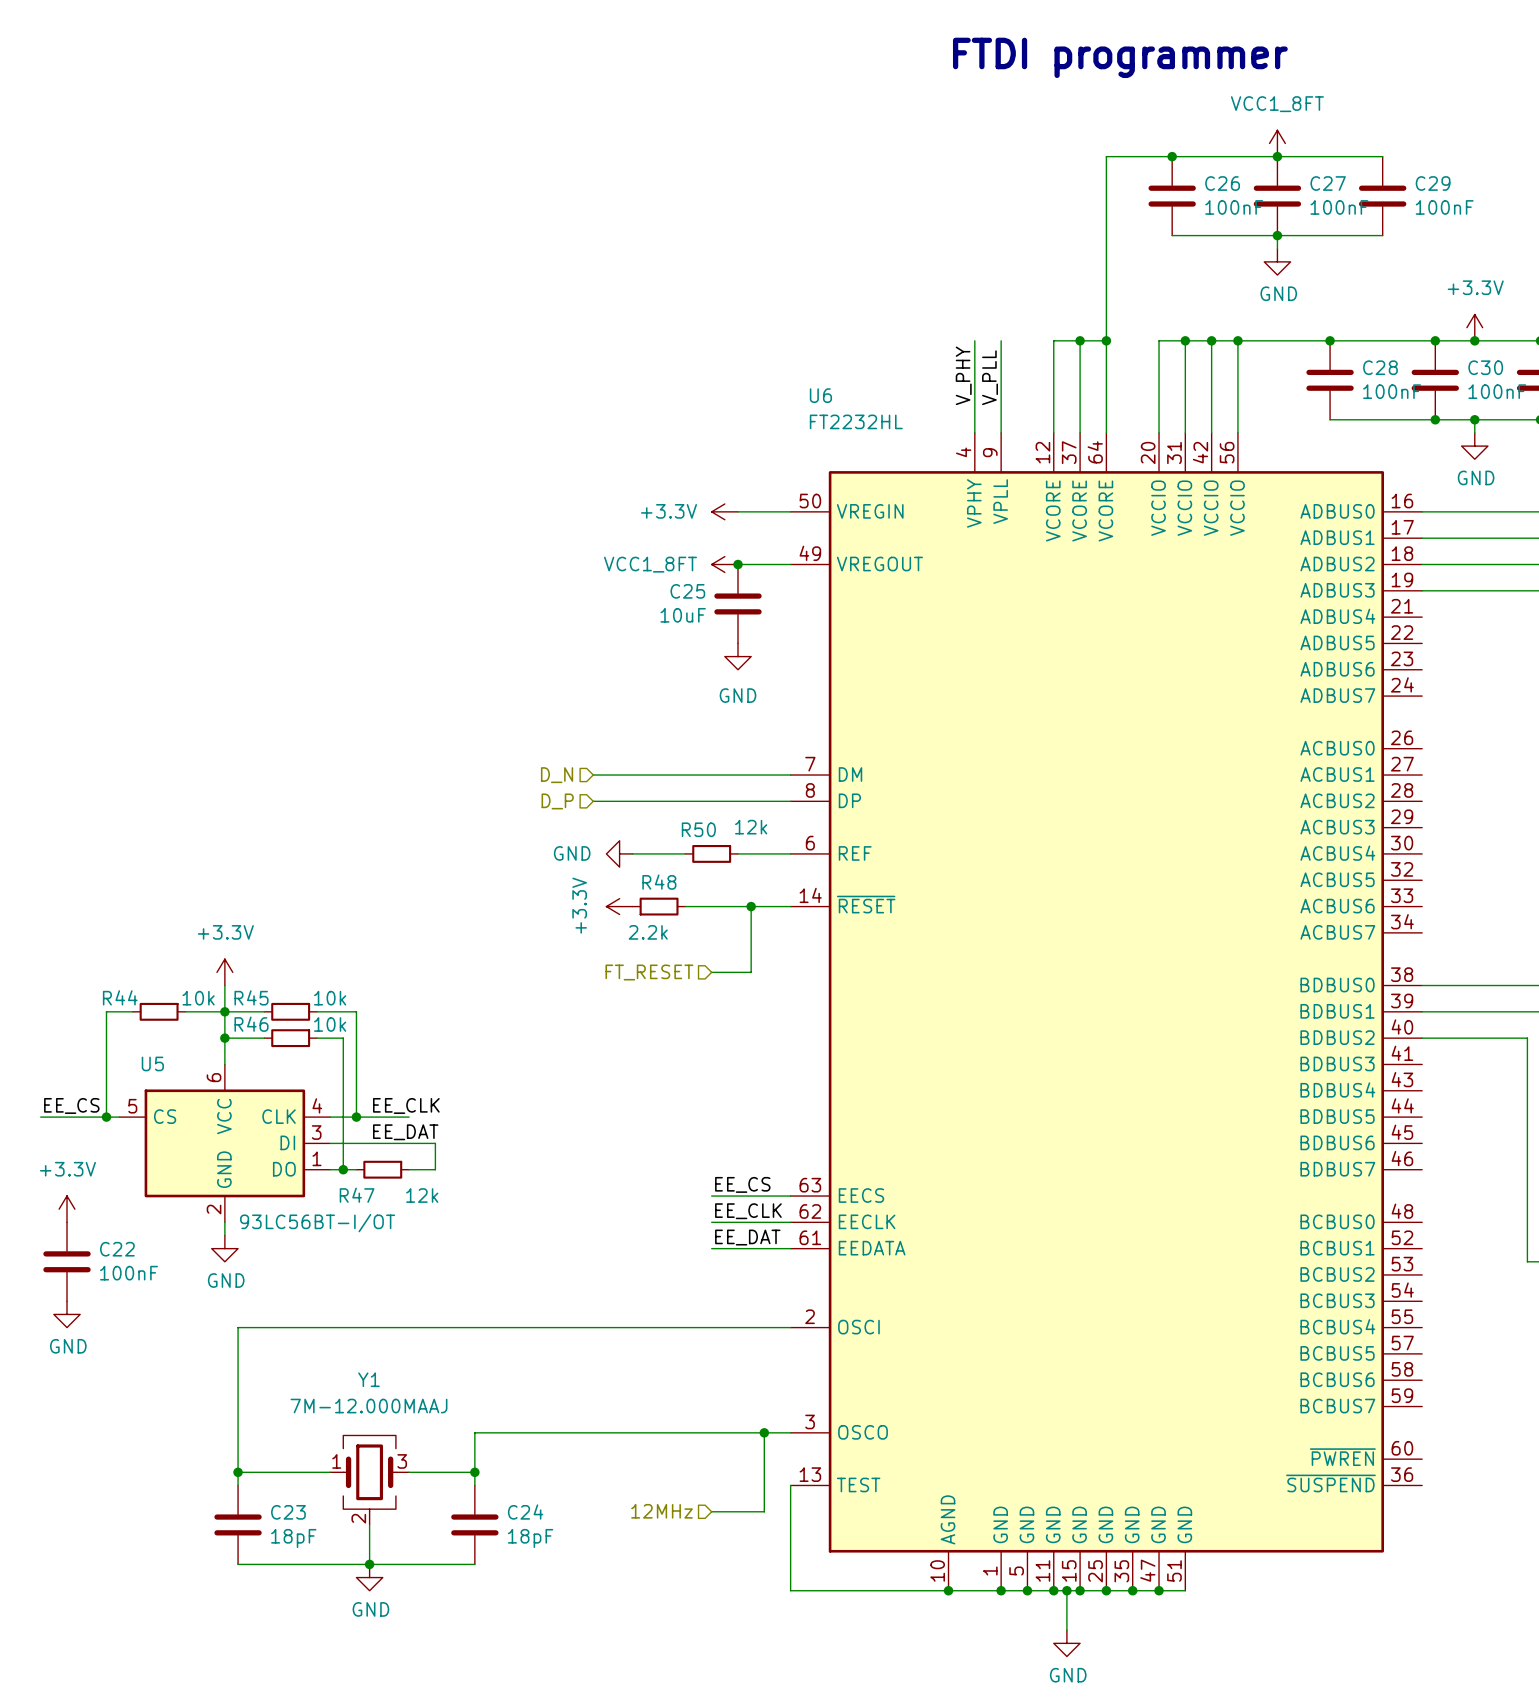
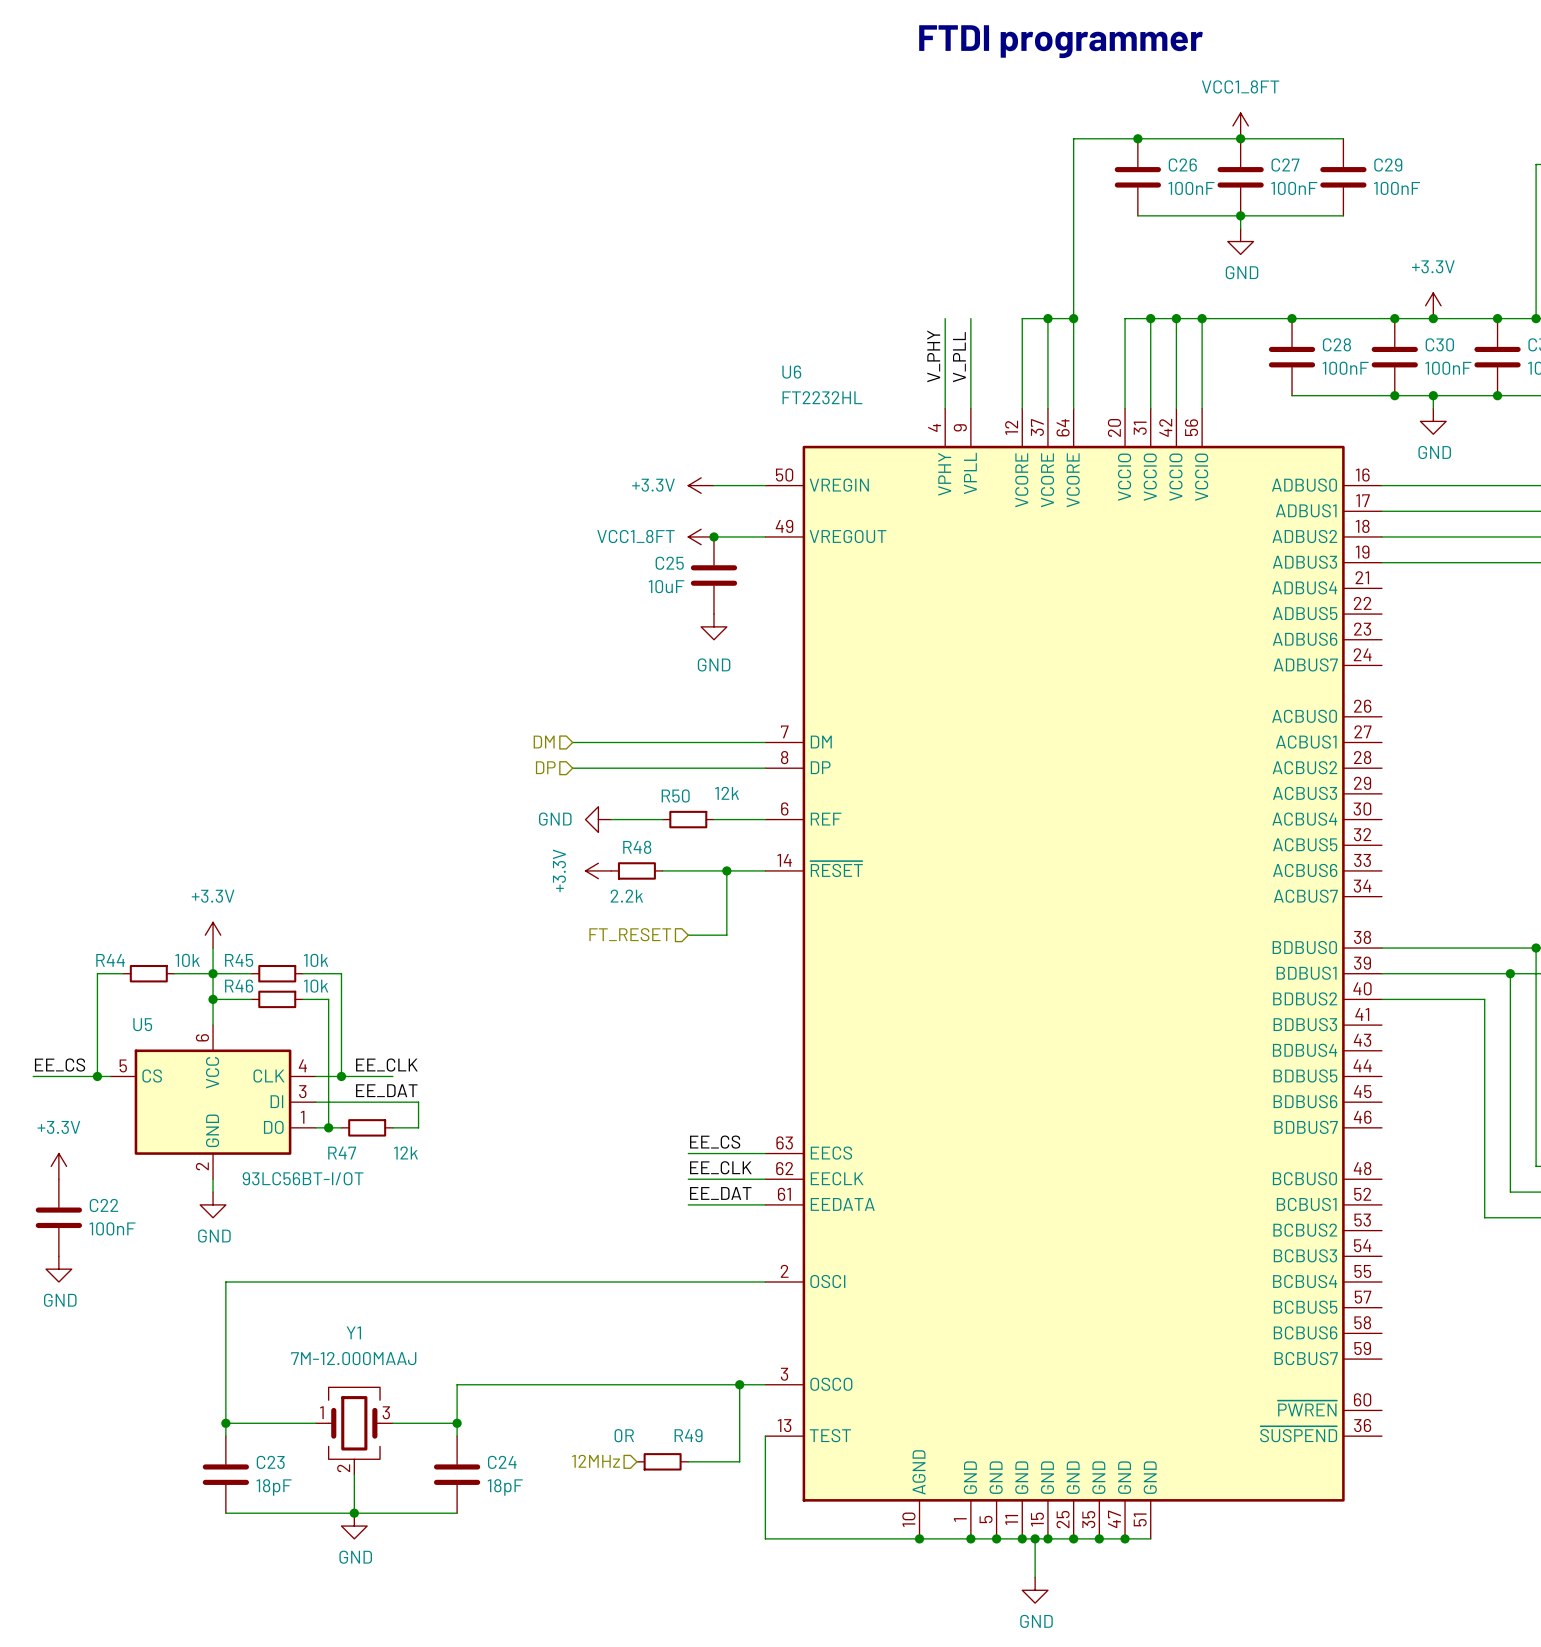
hierarchical label: D_N (557, 775) -> DM (544, 742)
hierarchical label: D_P (557, 801) -> DP (545, 767)
hierarchical label position: 12MHz (661, 1511) -> 12MHz (596, 1461)
R49: none -> 0R (662, 1461)

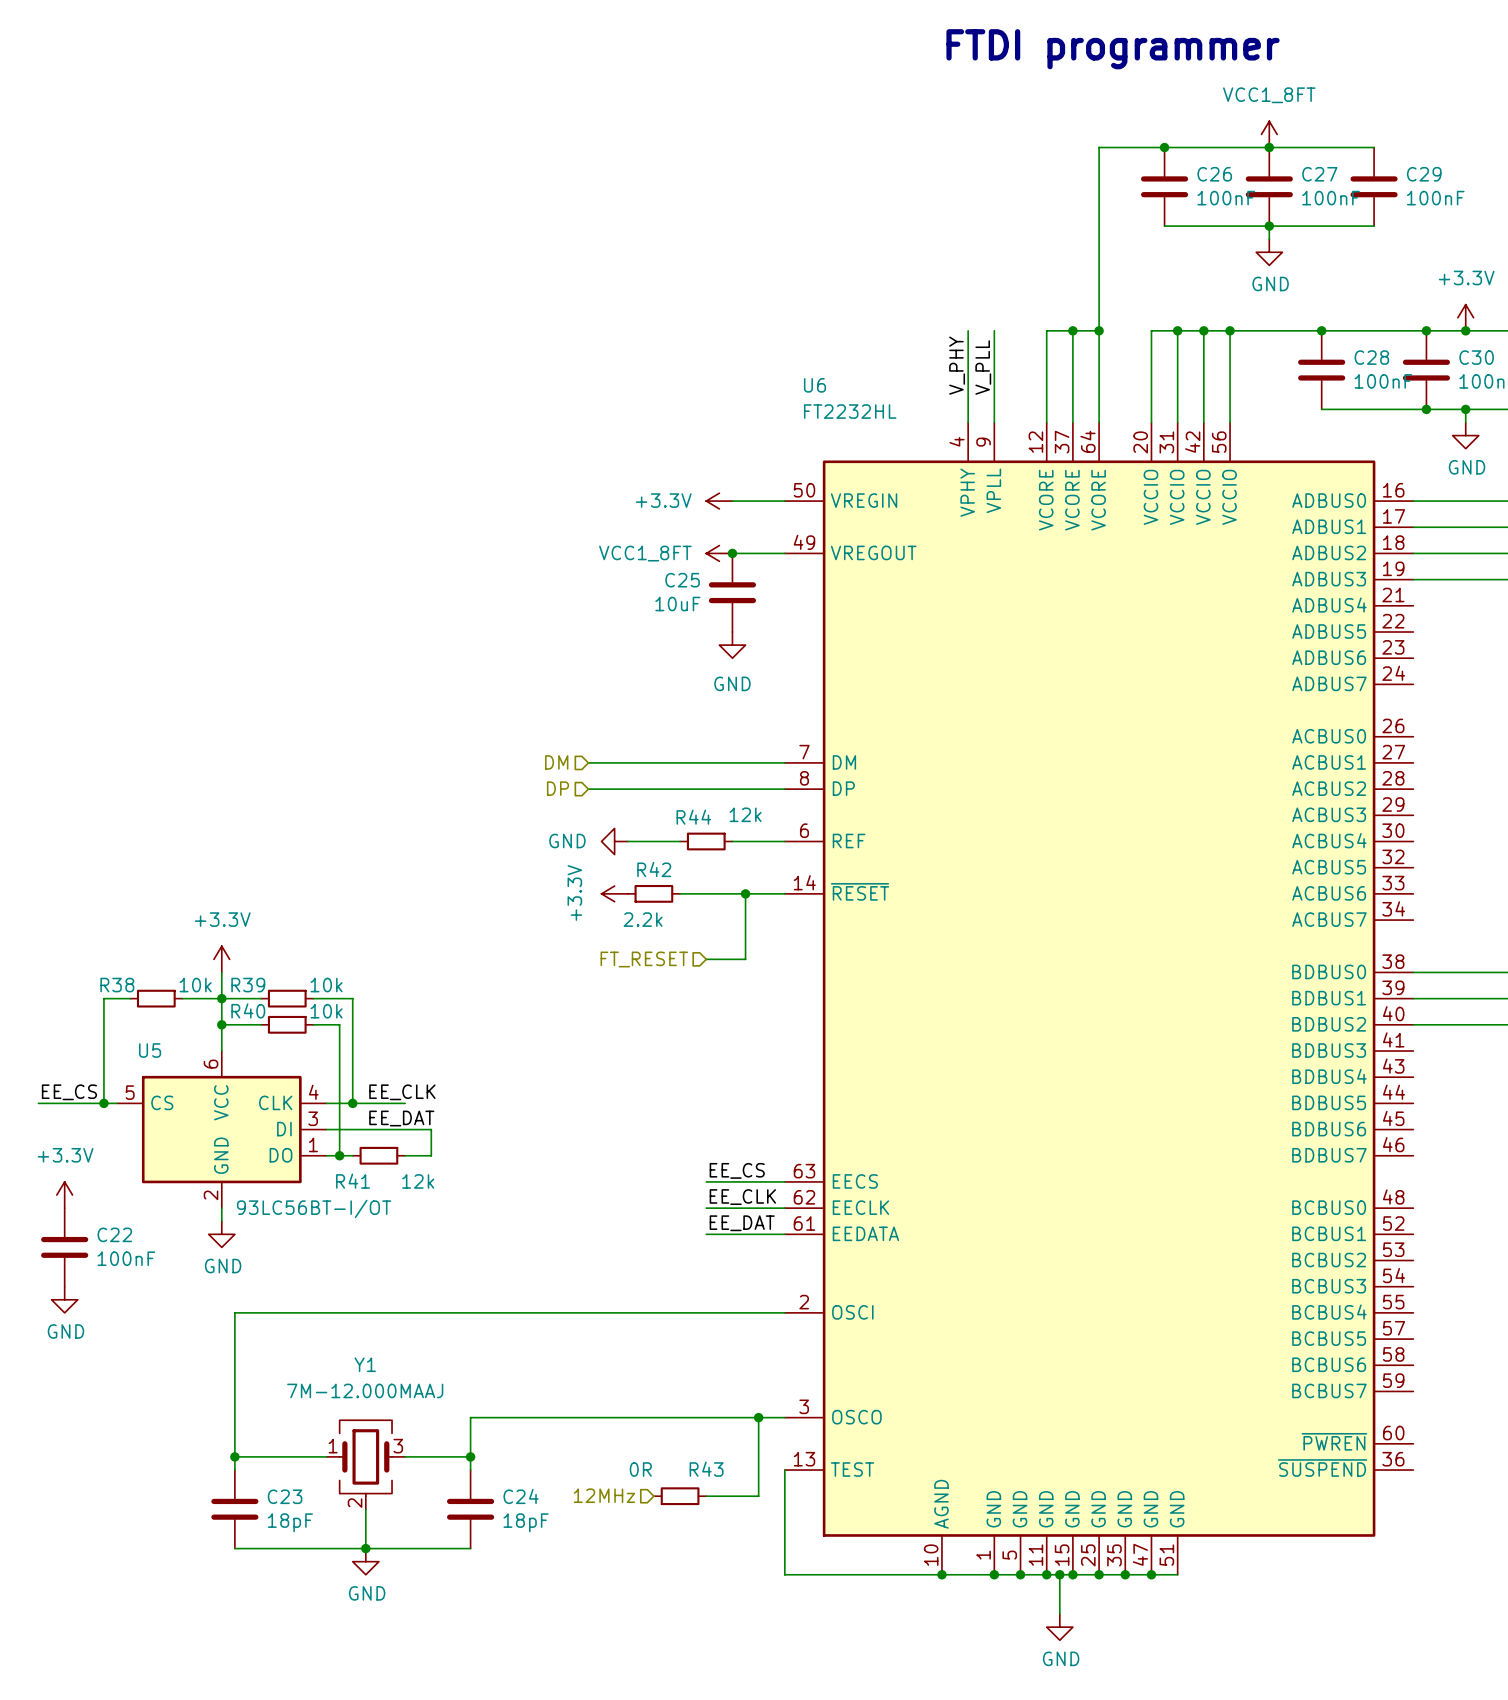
R50 name: R50 (675, 795) -> R44 (693, 817)
R48 name: R48 (637, 847) -> R42 (654, 869)
R44 name: R44 (110, 960) -> R38 (117, 985)
R45 name: R45 (239, 960) -> R39 (248, 985)
R46 name: R46 (239, 986) -> R40 (248, 1010)
R47 name: R47 (342, 1153) -> R41 (353, 1181)
R49 name: R49 (688, 1435) -> R43 (706, 1469)

